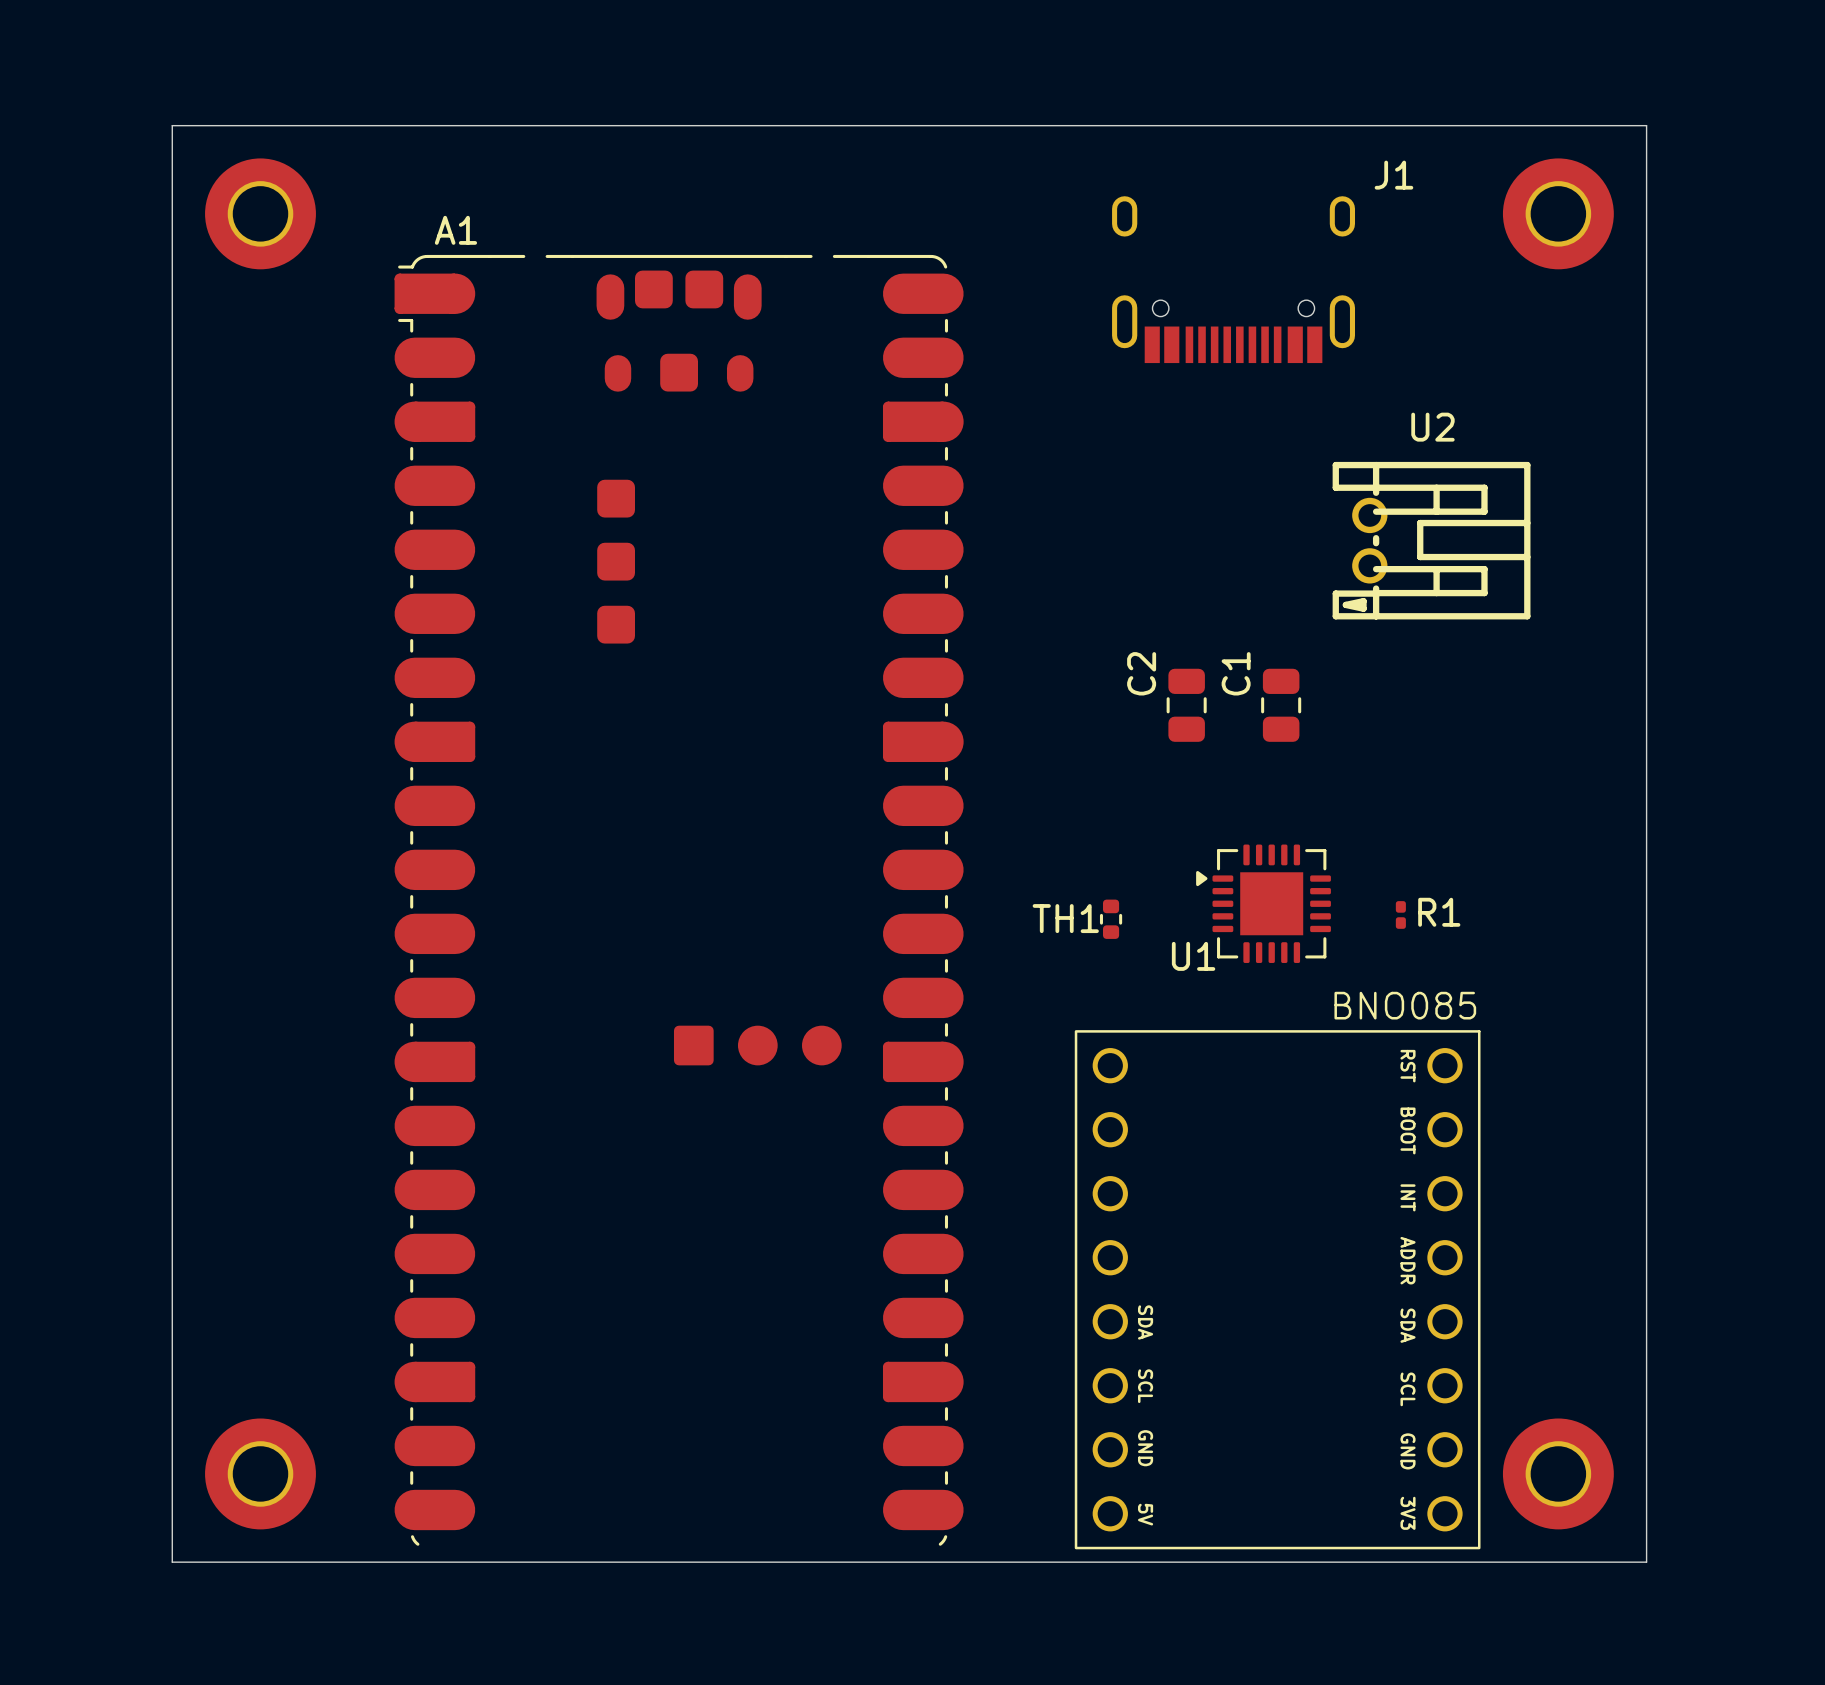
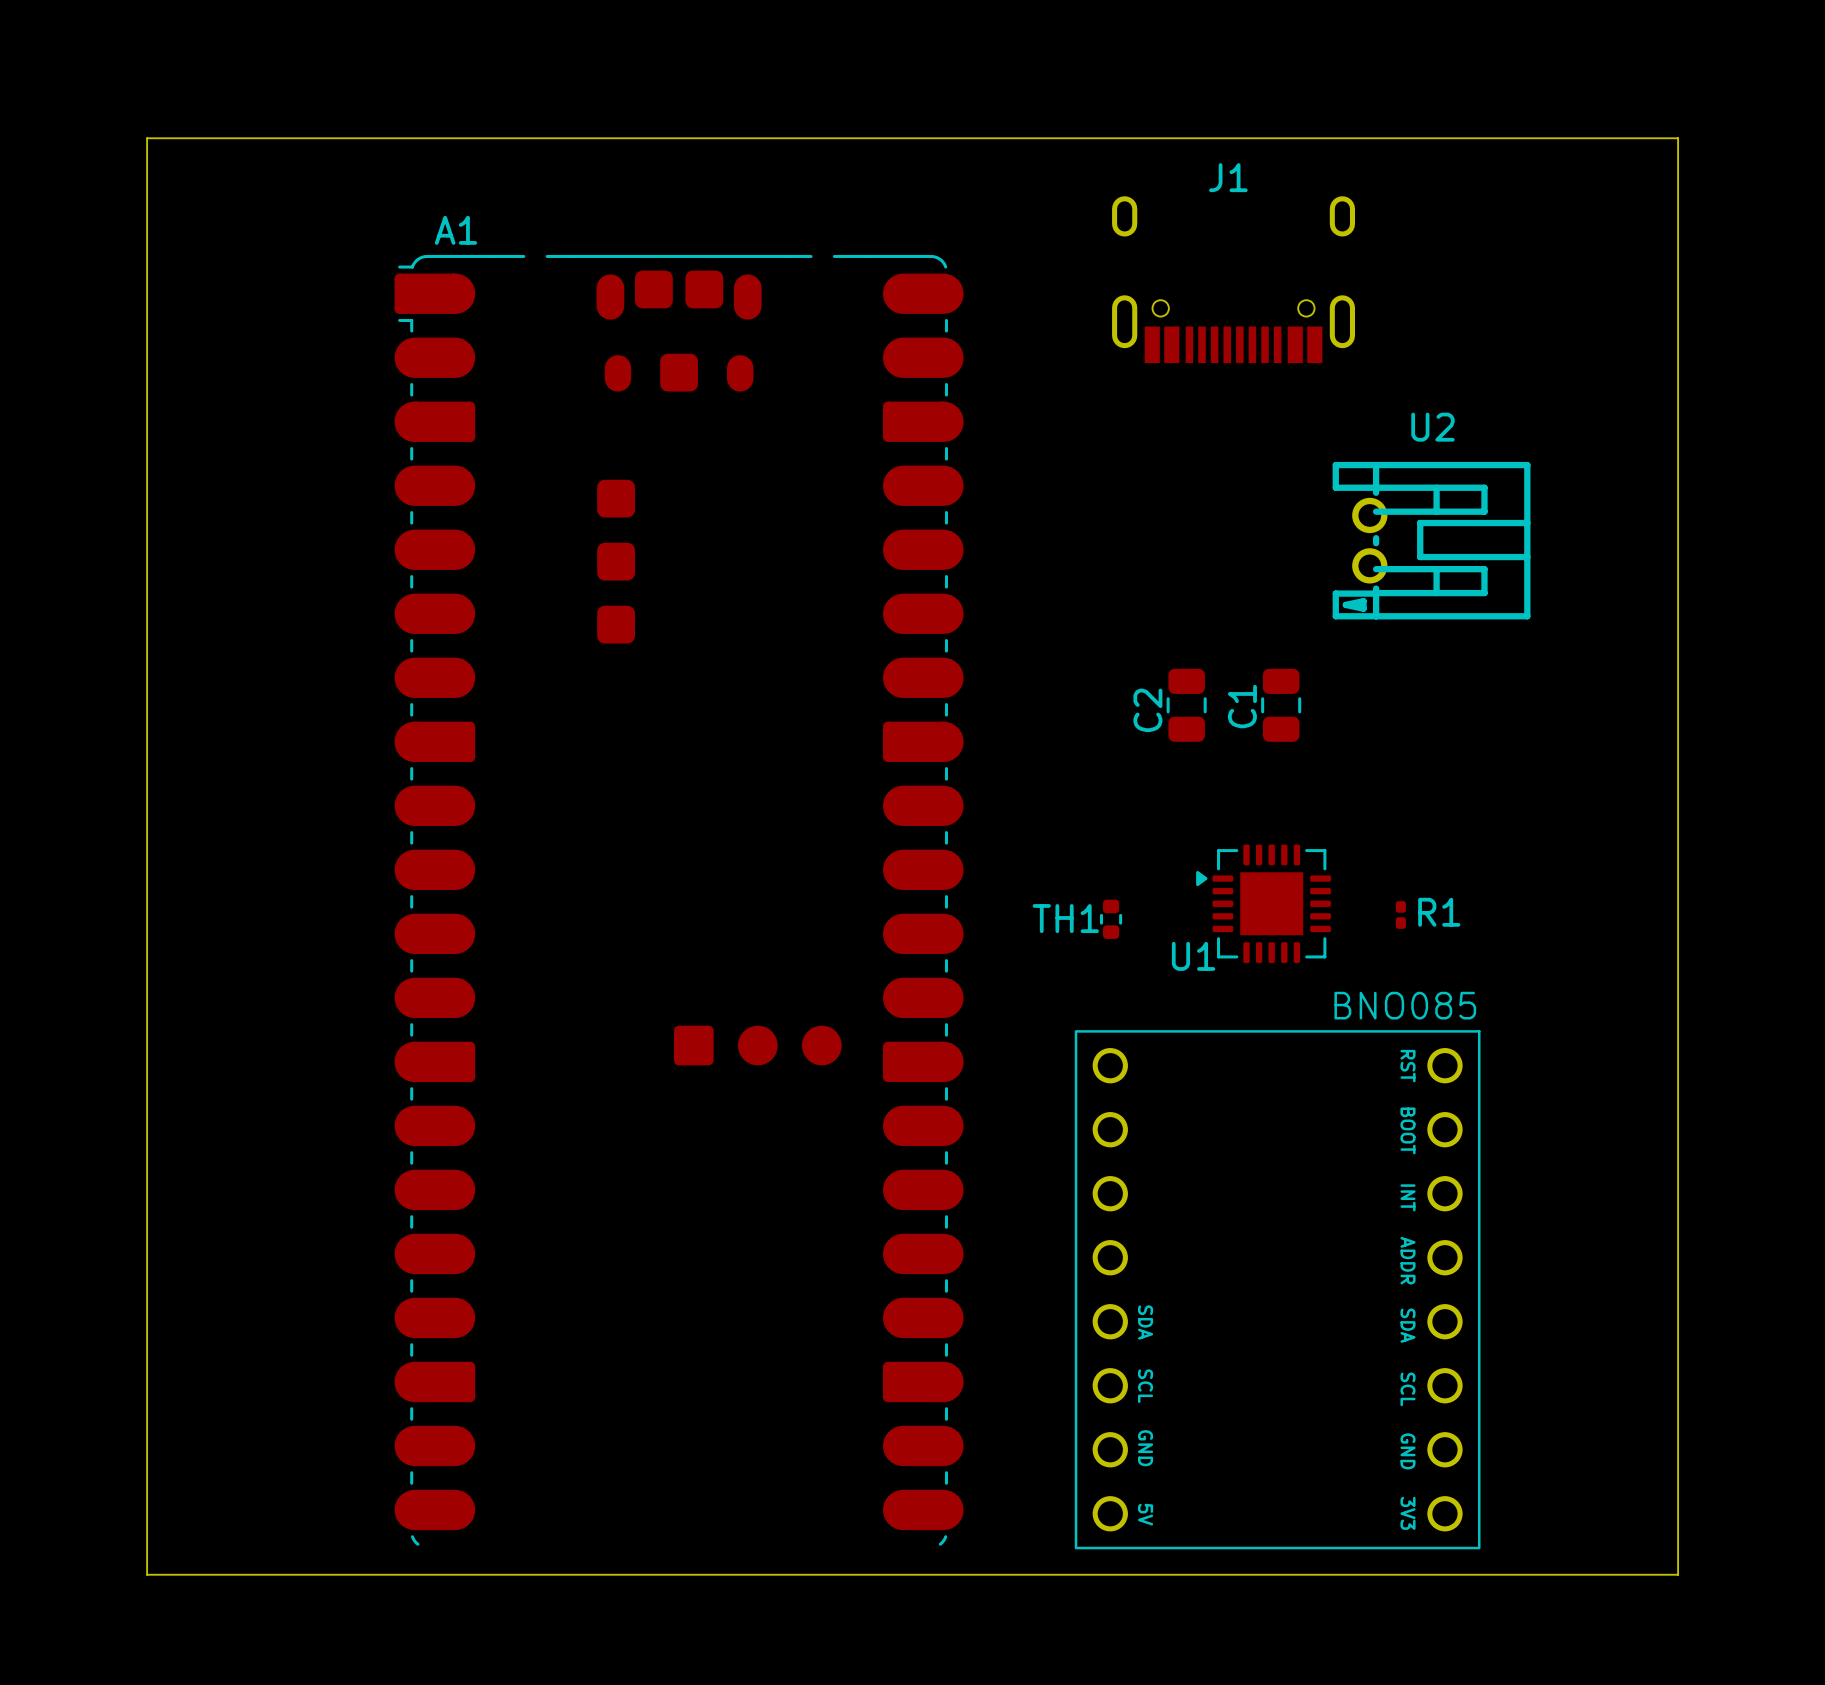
board edge: (172, 125) (1646, 125) (1646, 1562) (172, 1562) (172, 125) -> (147, 138) (147, 1574) (1678, 1574) (1678, 138) (147, 138)
J1 name position: J1 (1393, 175) -> J1 (1228, 177)
part: (260, 213) -> none
part: (1558, 213) -> none
C2 name position: C2 (1141, 673) -> C2 (1147, 710)
C1 name position: C1 (1236, 673) -> C1 (1242, 706)
part: (260, 1473) -> none
part: (1558, 1473) -> none

